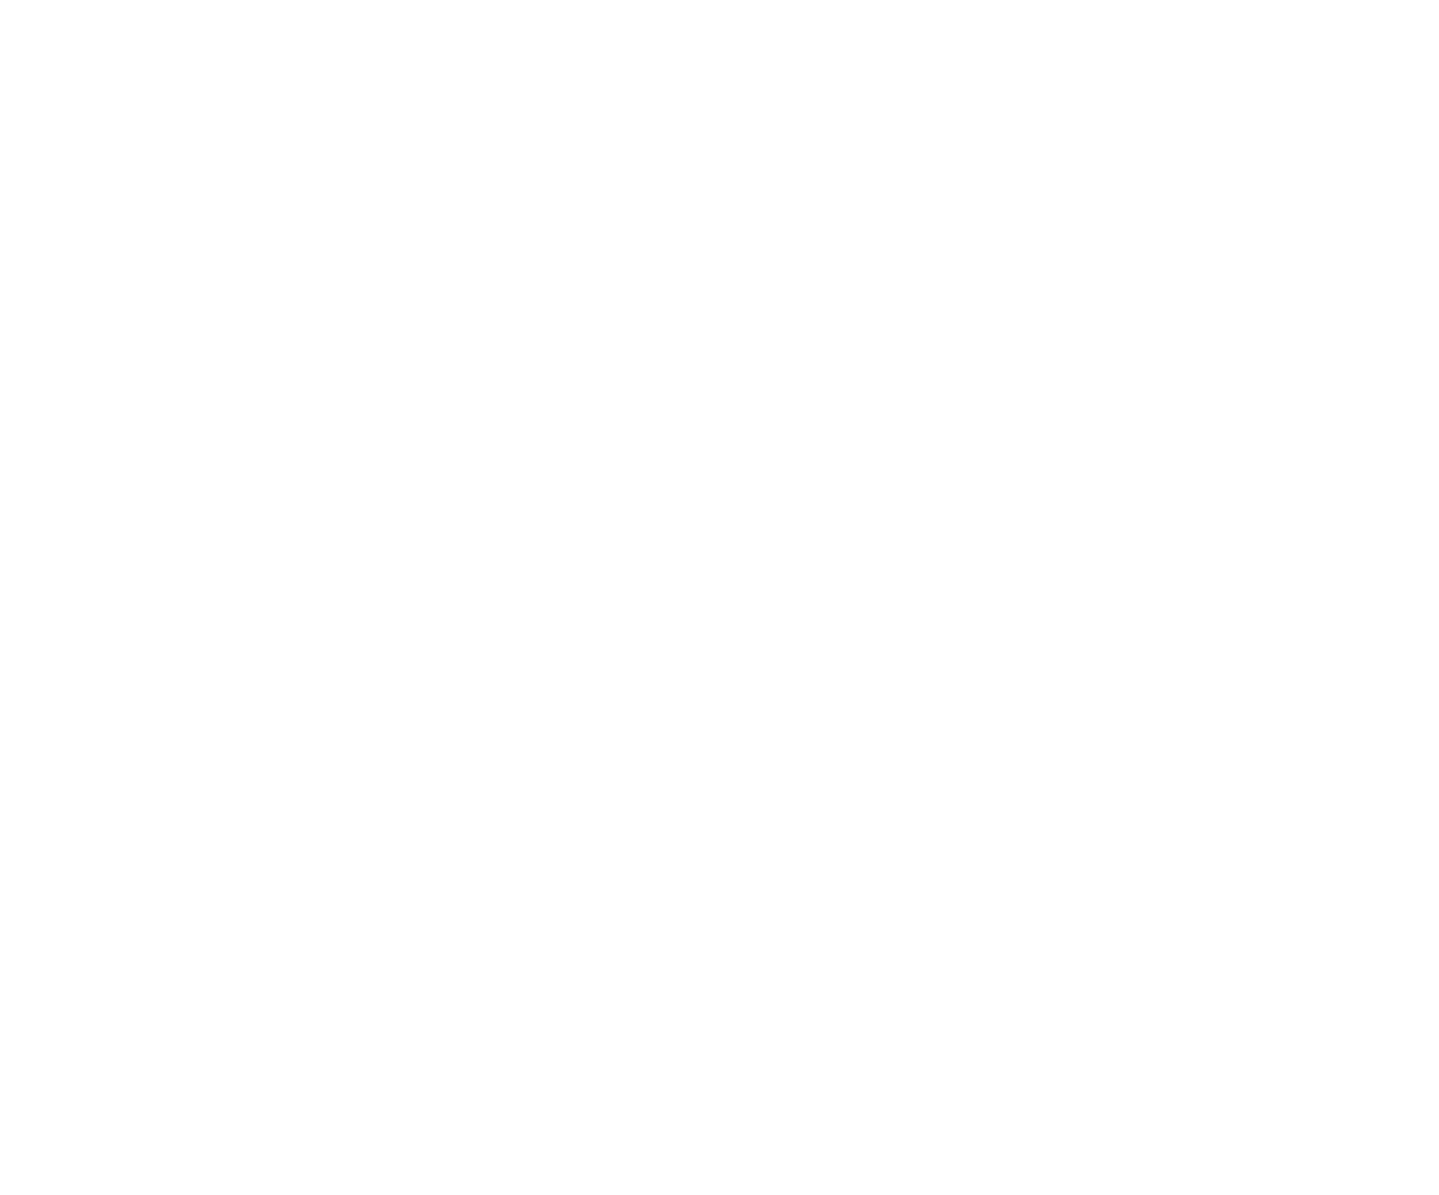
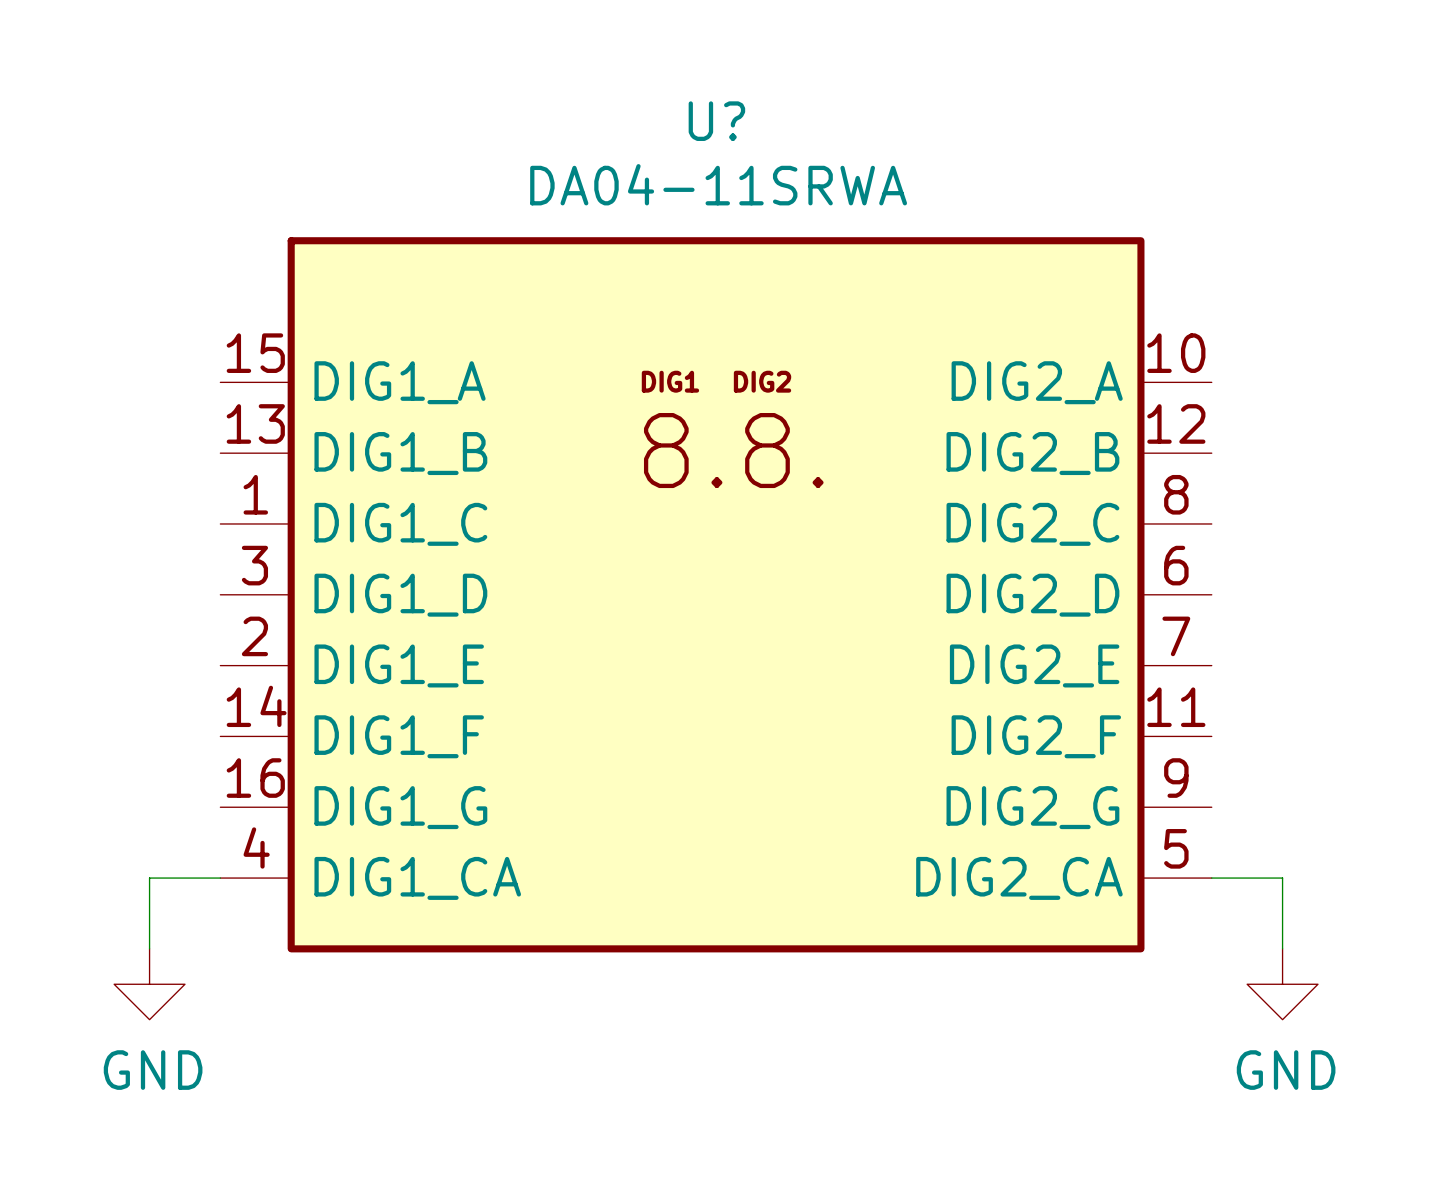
U?: none -> DA04-11SRWA (716, 594)
wire: none -> (220, 878) (149, 878) (149, 948)
wire: none -> (1211, 878) (1282, 878) (1282, 948)
power symbol: none -> GND (149, 984)
power symbol: none -> GND (1282, 984)

